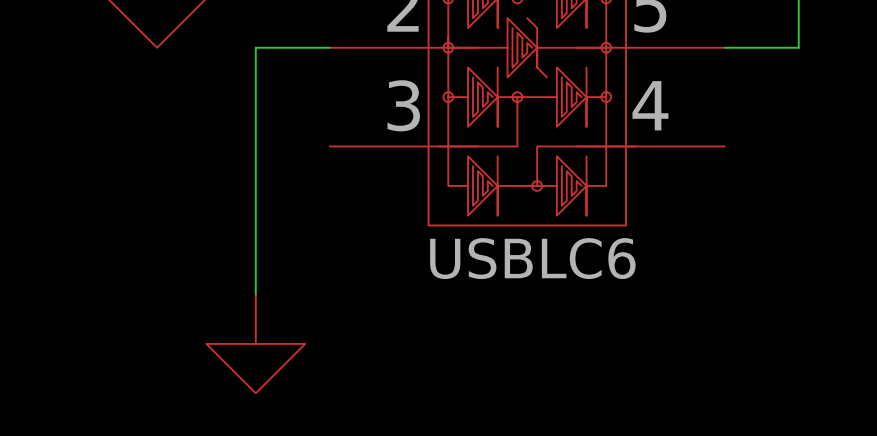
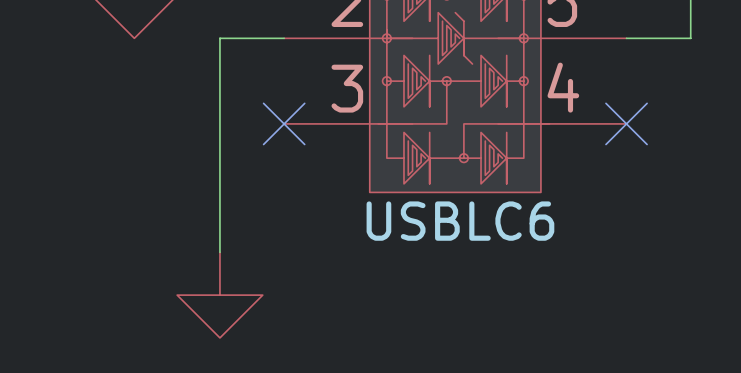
no-connect mark: none -> (284, 123)
no-connect mark: none -> (626, 123)

